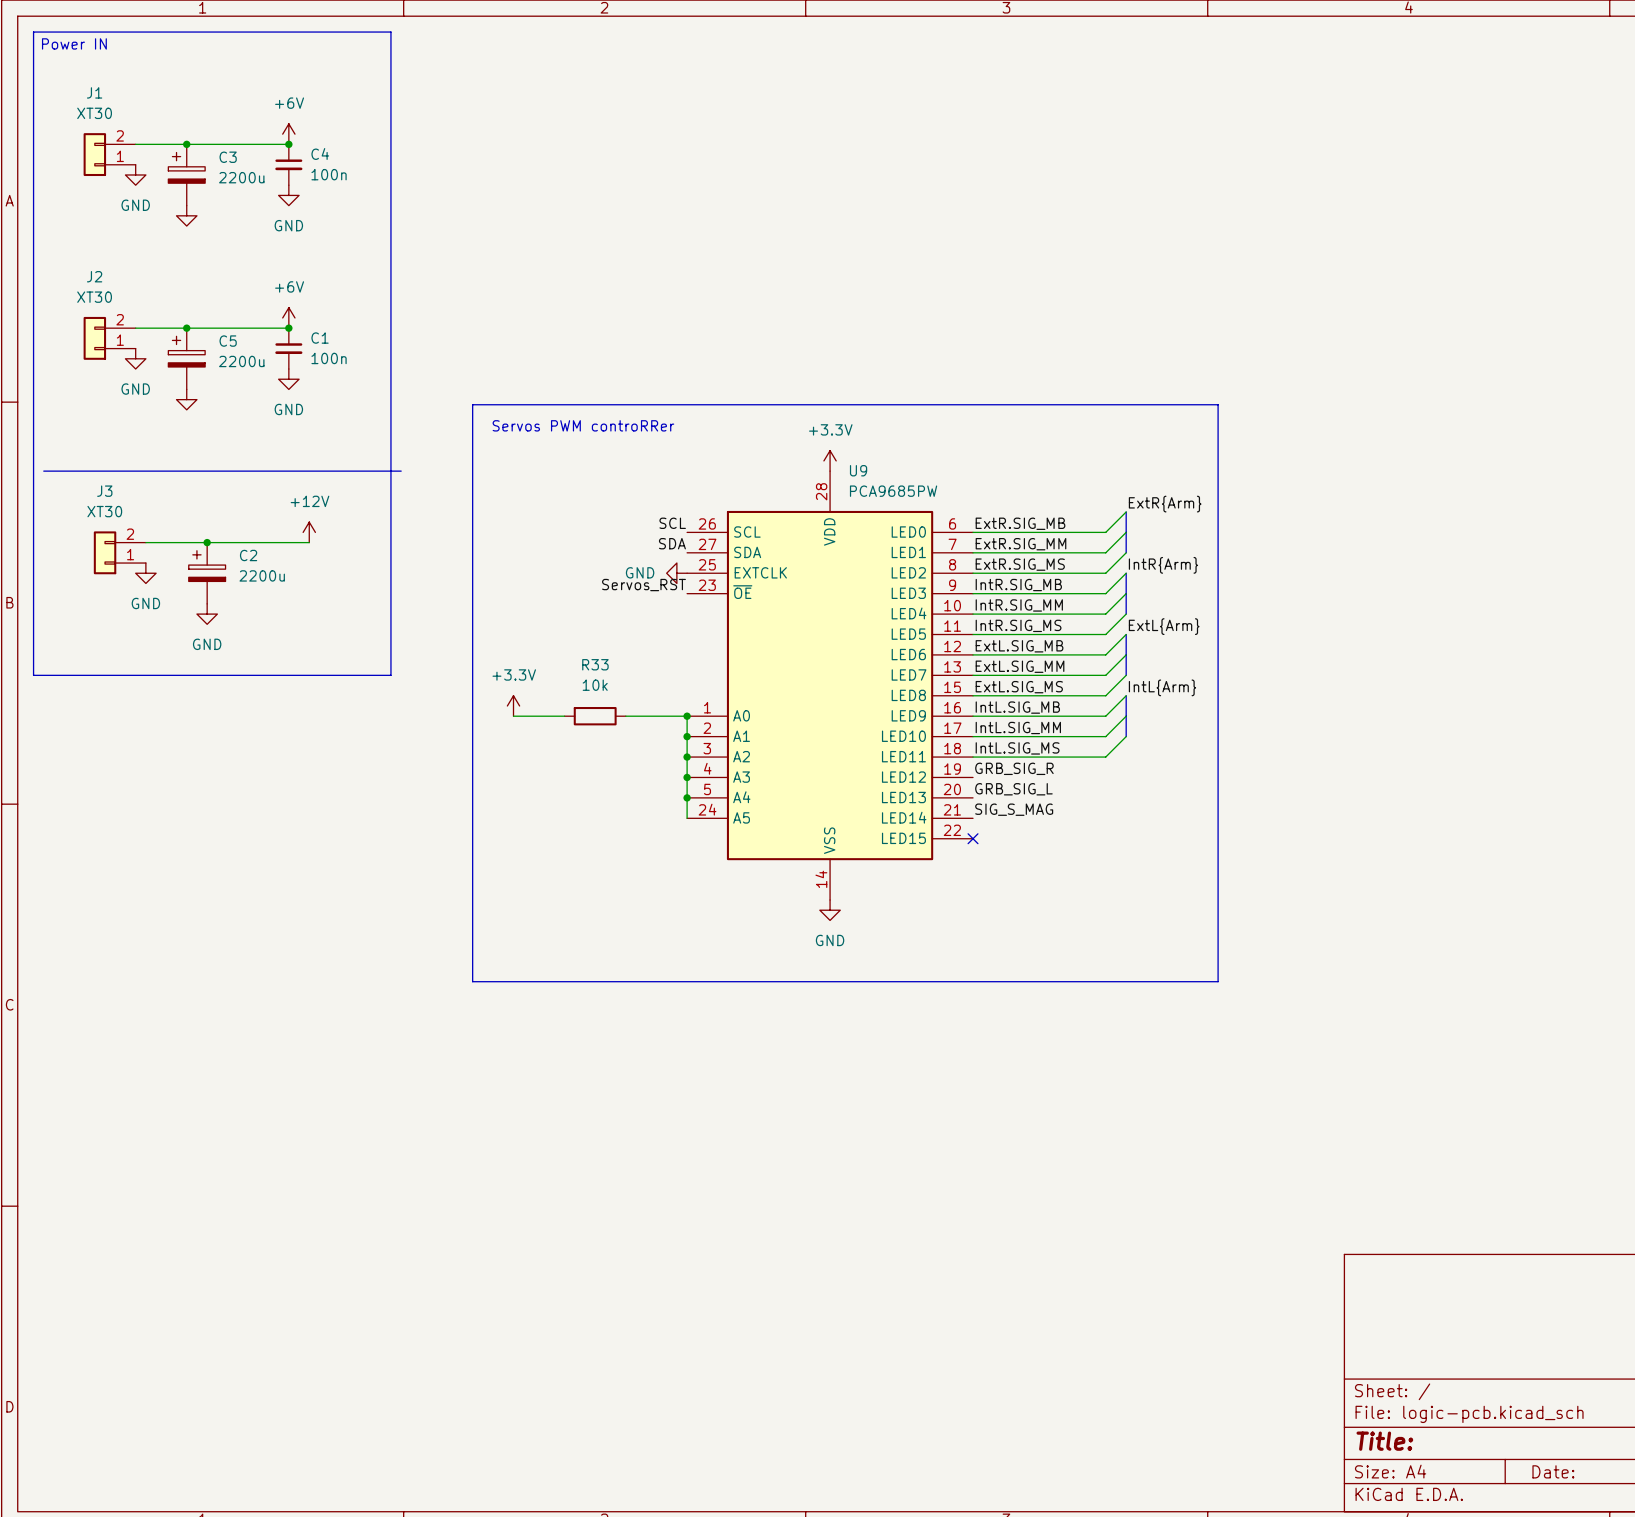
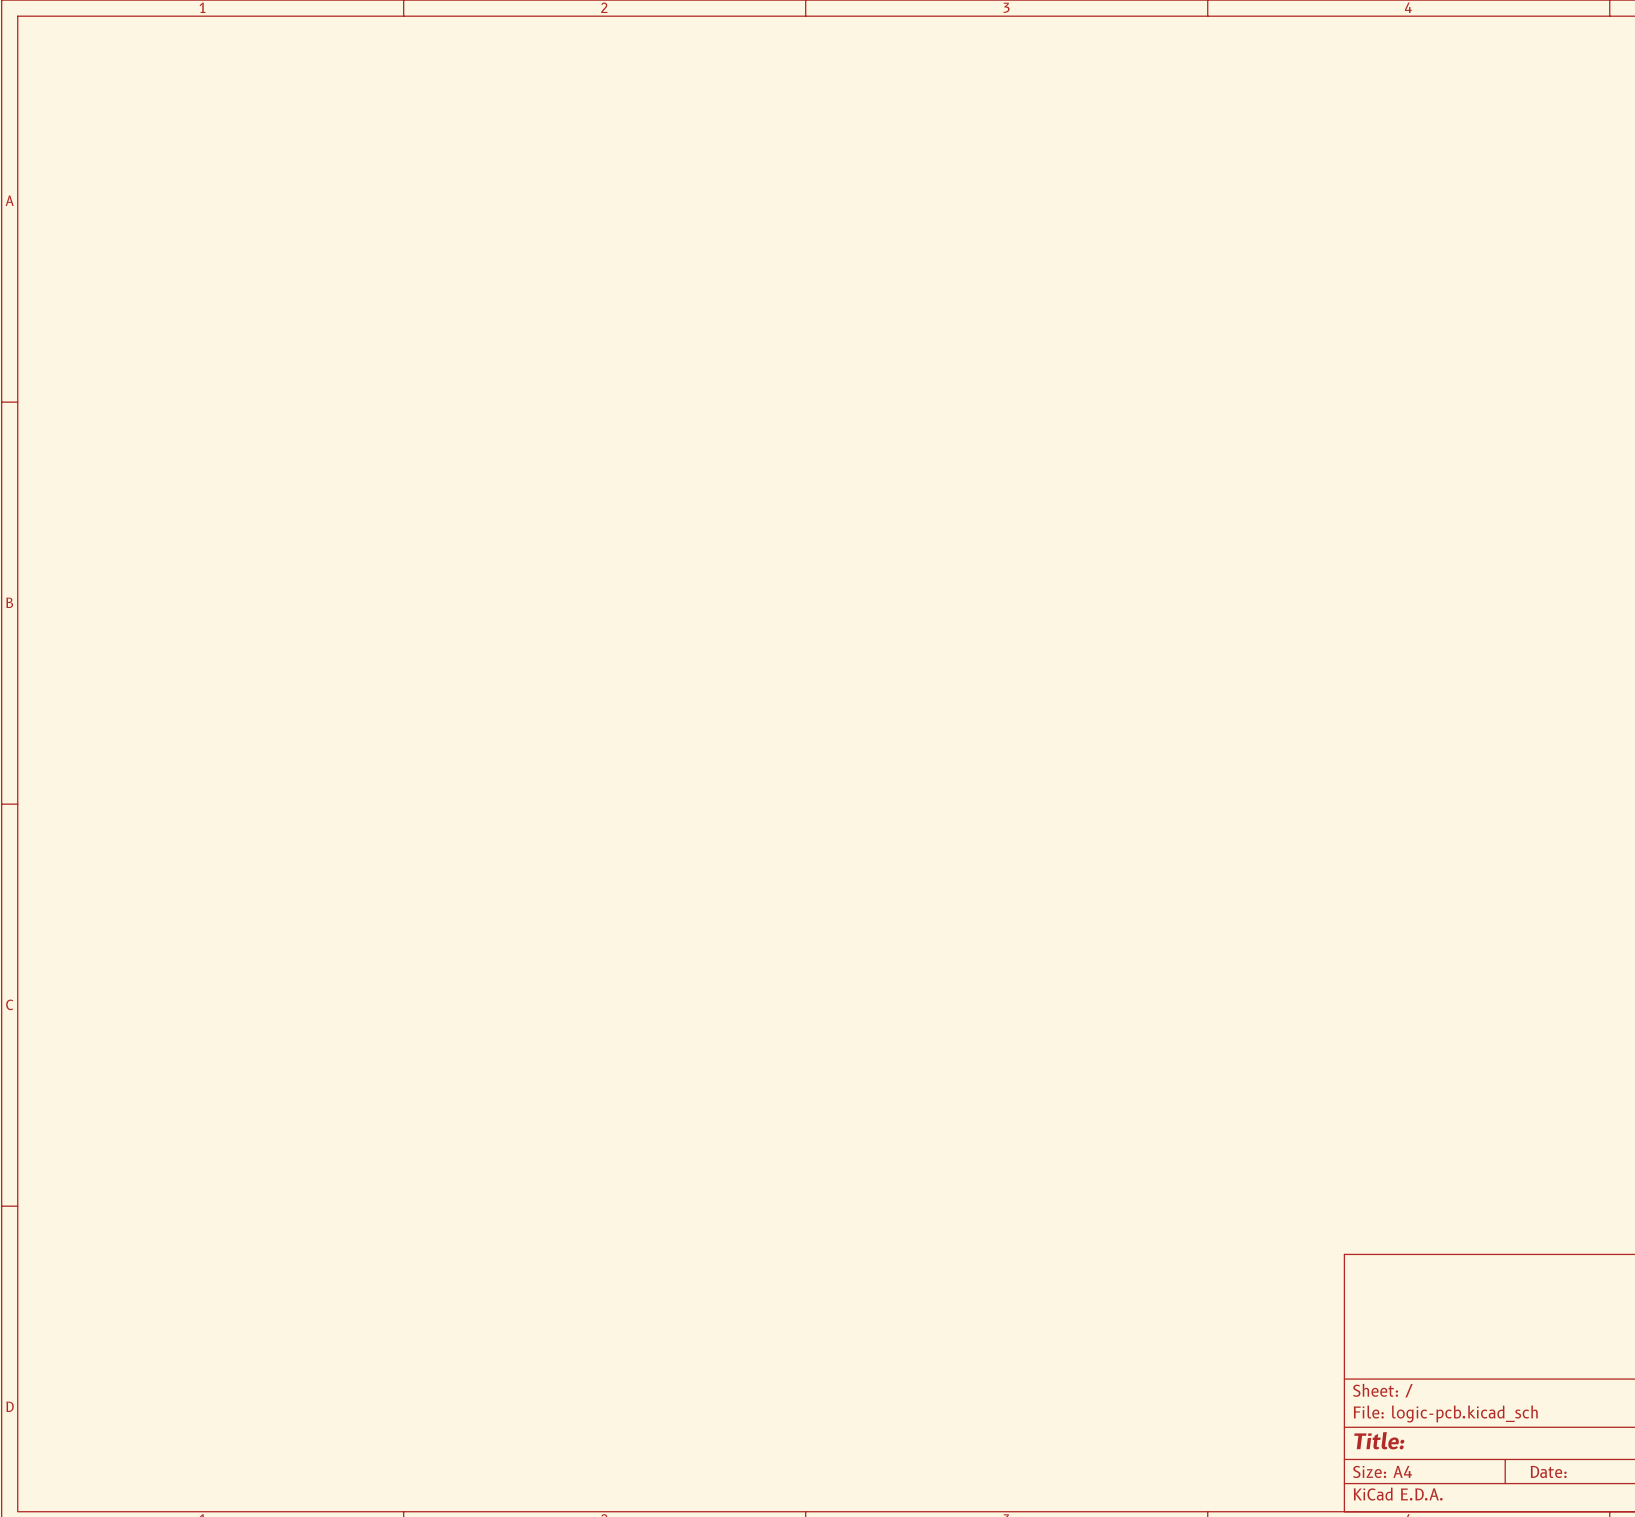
line: (33, 32) (390, 32) (390, 675) (33, 675) (33, 32) -> none
text: Power IN (74, 43) -> none
power symbol: +6V (288, 134) -> none
wire: (135, 144) (288, 144) -> none
junction: (186, 144) -> none
junction: (288, 144) -> none
J1: XT30 (109, 154) -> none
C4: 100n (288, 164) -> none
power symbol: GND (135, 174) -> none
C3: 2200u (186, 174) -> none
power symbol: GND (288, 195) -> none
power symbol: (186, 215) -> none
power symbol: +6V (288, 317) -> none
wire: (135, 328) (288, 328) -> none
junction: (186, 328) -> none
junction: (288, 328) -> none
J2: XT30 (109, 338) -> none
C1: 100n (288, 348) -> none
power symbol: GND (135, 358) -> none
C5: 2200u (186, 358) -> none
power symbol: GND (288, 379) -> none
power symbol: (186, 399) -> none
line: (472, 404) (1218, 404) (1218, 981) (472, 981) (472, 404) -> none
text: Servos PWM controRRer (583, 425) -> none
power symbol: +3.3V (830, 460) -> none
line: (43, 471) (401, 471) -> none
label: ExtR{Arm} (1165, 504) -> none
wire: (1126, 511) (1105, 532) (973, 532) -> none
bus: (1126, 511) (1126, 552) -> none
label: SCL (672, 523) -> none
label: ExtR.SIG_MB (1020, 523) -> none
power symbol: +12V (309, 532) -> none
wire: (1126, 532) (1105, 552) (973, 552) -> none
wire: (145, 542) (309, 542) -> none
junction: (207, 542) -> none
label: SDA (672, 543) -> none
label: ExtR.SIG_MM (1020, 544) -> none
J3: XT30 (119, 552) -> none
wire: (1126, 552) (1105, 573) (973, 573) -> none
label: ExtR.SIG_MS (1020, 564) -> none
label: IntR{Arm} (1163, 565) -> none
power symbol: GND (145, 573) -> none
C2: 2200u (207, 573) -> none
power symbol: GND (676, 573) -> none
wire: (1126, 573) (1105, 593) (973, 593) -> none
bus: (1126, 573) (1126, 614) -> none
label: Servos_RST (643, 585) -> none
label: IntR.SIG_MB (1018, 585) -> none
wire: (1126, 593) (1105, 614) (973, 614) -> none
label: IntR.SIG_MM (1019, 605) -> none
power symbol: GND (207, 614) -> none
wire: (1126, 614) (1105, 634) (973, 634) -> none
label: IntR.SIG_MS (1018, 625) -> none
label: ExtL{Arm} (1164, 626) -> none
wire: (1126, 634) (1105, 654) (973, 654) -> none
bus: (1126, 634) (1126, 675) -> none
label: ExtL.SIG_MB (1019, 646) -> none
wire: (1126, 654) (1105, 675) (973, 675) -> none
label: ExtL.SIG_MM (1020, 666) -> none
wire: (1126, 675) (1105, 695) (973, 695) -> none
U9: PCA9685PW (830, 685) -> none
label: ExtL.SIG_MS (1019, 687) -> none
label: IntL{Arm} (1162, 687) -> none
wire: (1126, 695) (1105, 716) (973, 716) -> none
bus: (1126, 695) (1126, 736) -> none
power symbol: +3.3V (513, 705) -> none
label: IntL.SIG_MB (1017, 707) -> none
wire: (513, 716) (564, 716) -> none
R33: 10k (595, 716) -> none
wire: (625, 716) (687, 716) (687, 818) -> none
junction: (687, 716) -> none
wire: (1126, 716) (1105, 736) (973, 736) -> none
label: IntL.SIG_MM (1018, 727) -> none
junction: (687, 736) -> none
wire: (1126, 736) (1105, 757) (973, 757) -> none
label: IntL.SIG_MS (1017, 748) -> none
junction: (687, 757) -> none
label: GRB_SIG_R (1014, 768) -> none
junction: (687, 777) -> none
label: GRB_SIG_L (1013, 789) -> none
junction: (687, 797) -> none
label: SIG_S_MAG (1014, 809) -> none
no-connect mark: (973, 838) -> none
power symbol: GND (830, 910) -> none

